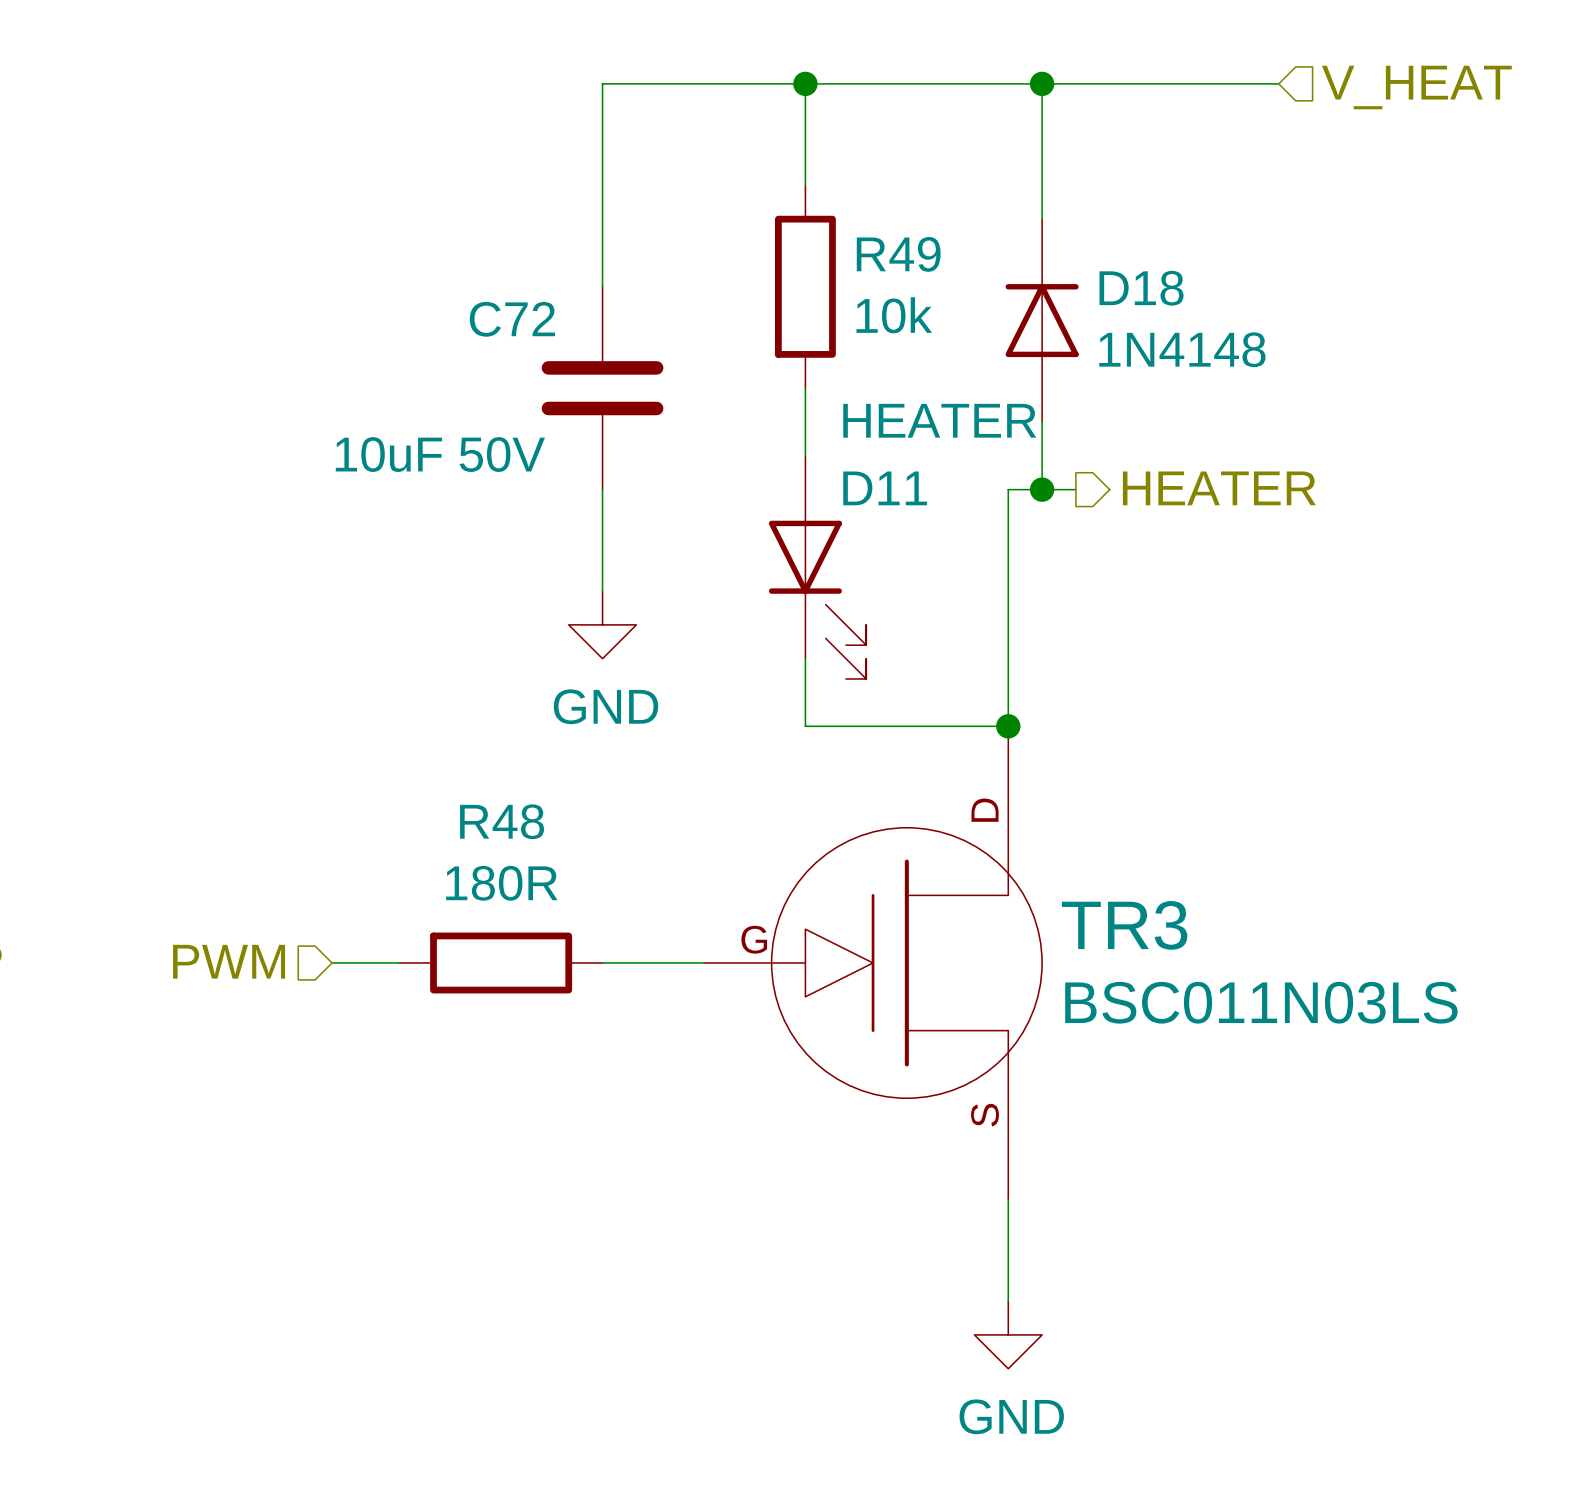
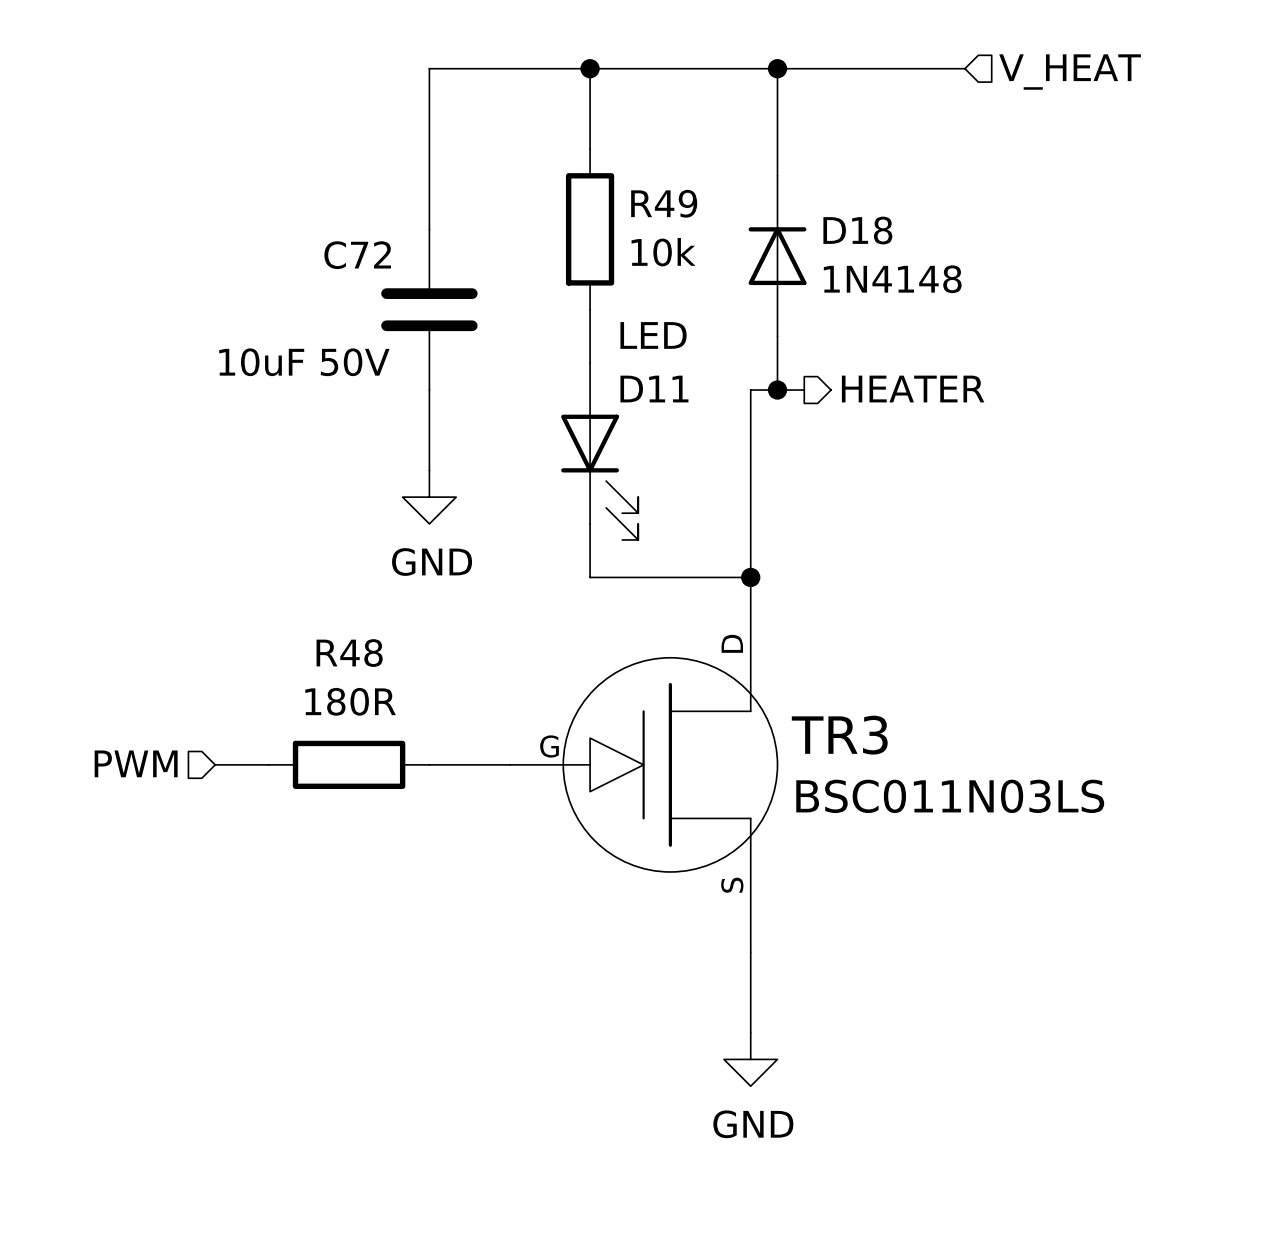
D11 value: HEATER (939, 420) -> LED (653, 335)

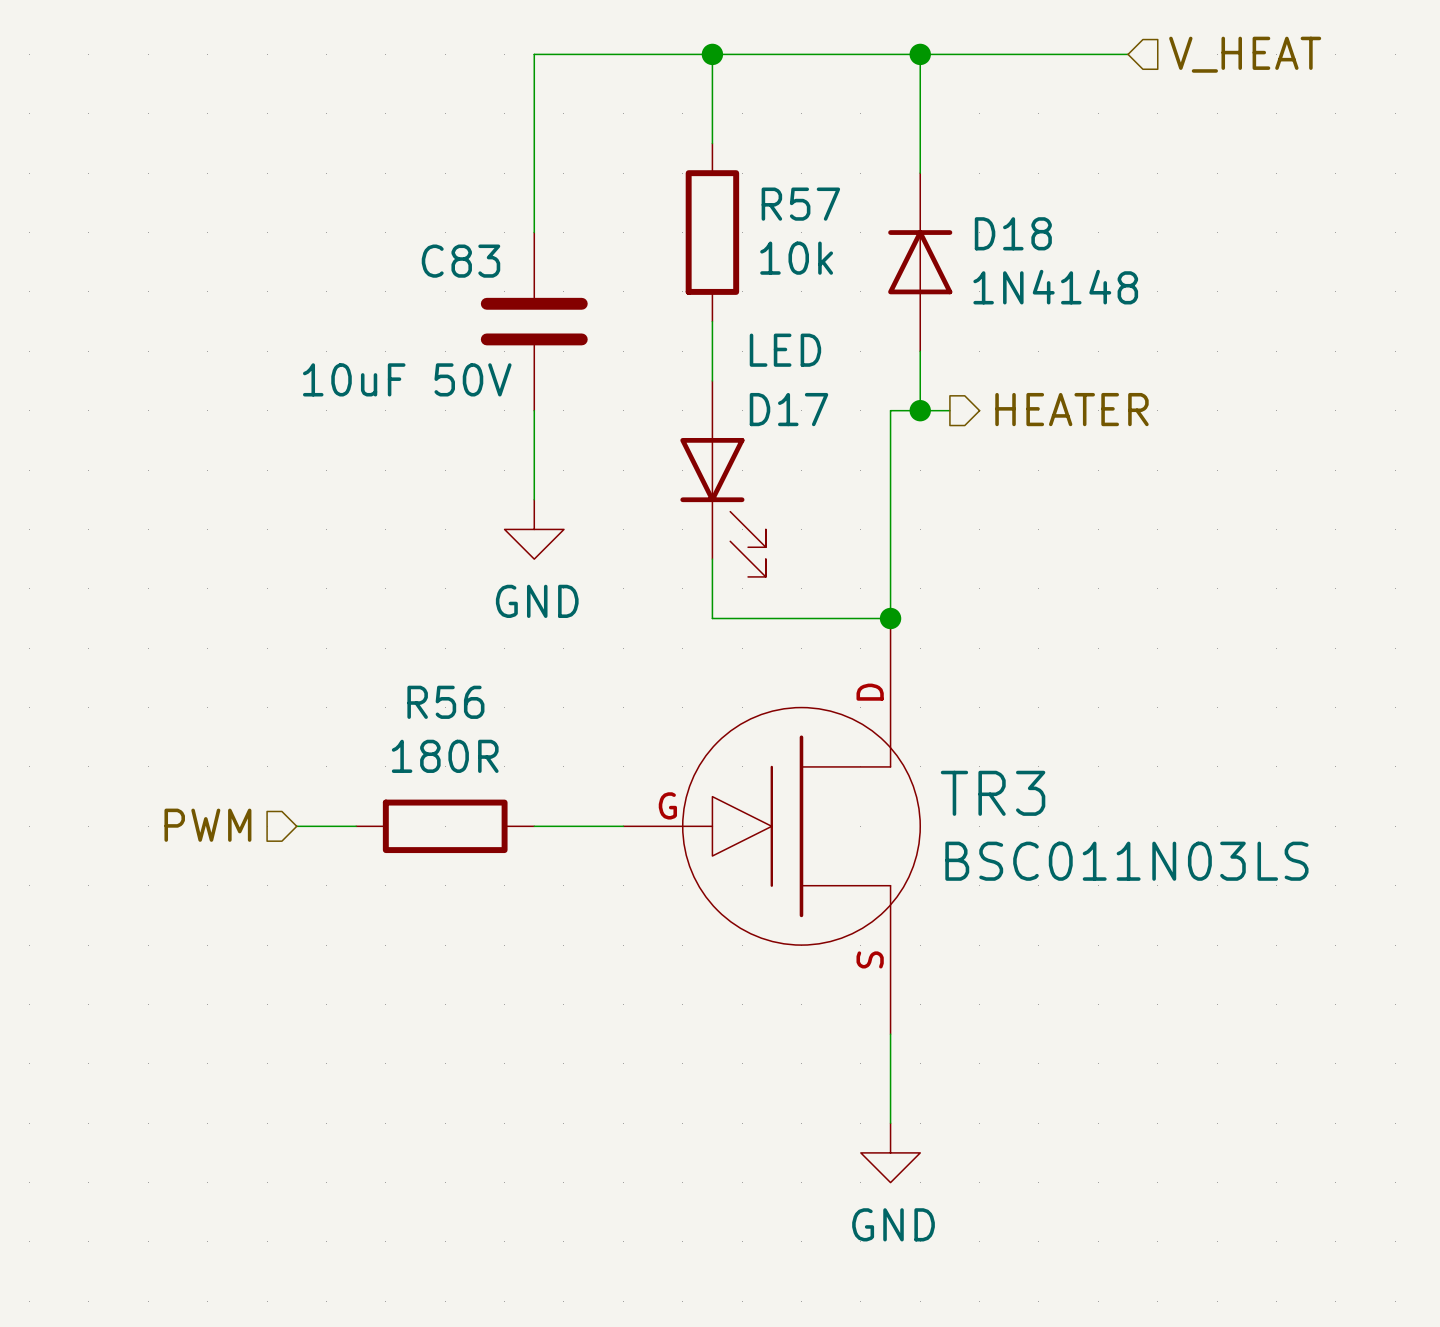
R49 name: R49 (664, 203) -> R57 (800, 204)
C72 name: C72 (357, 255) -> C83 (460, 261)
D11 name: D11 (654, 389) -> D17 (788, 409)
R48 name: R48 (349, 653) -> R56 (445, 702)

